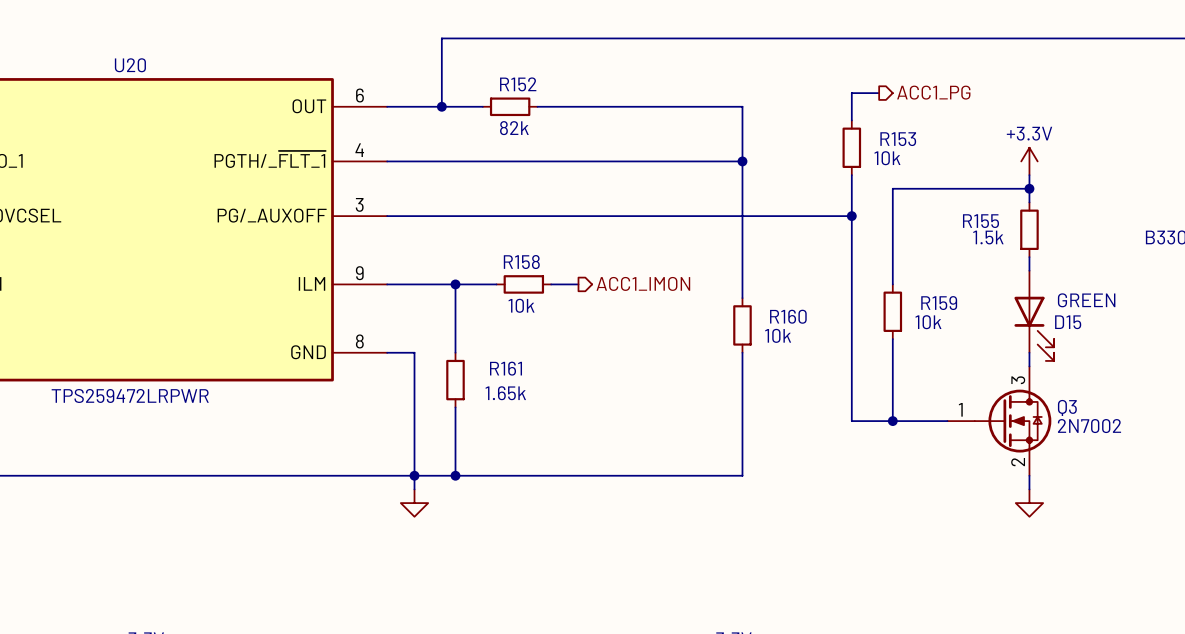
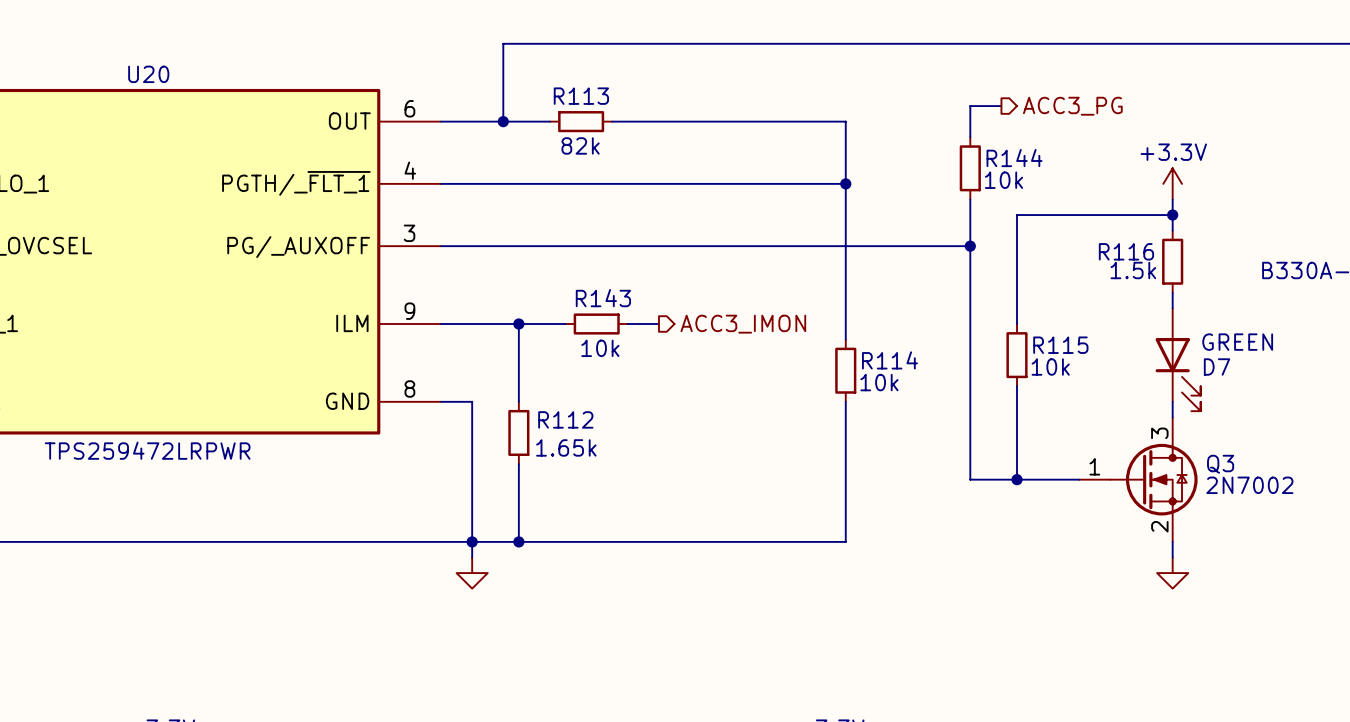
R152 name: R152 (518, 84) -> R113 (581, 96)
hierarchical label: ACC1_PG (933, 92) -> ACC3_PG (1072, 106)
R153 name: R153 (898, 139) -> R144 (1014, 158)
R155 name: R155 (980, 221) -> R116 (1126, 251)
R158 name: R158 (521, 262) -> R143 (603, 298)
hierarchical label: ACC1_IMON (643, 283) -> ACC3_IMON (743, 324)
R159 name: R159 (939, 303) -> R115 (1060, 345)
R160 name: R160 (788, 316) -> R114 (889, 360)
D15 name: D15 (1068, 322) -> D7 (1217, 367)
R161 name: R161 (506, 368) -> R112 (565, 419)

